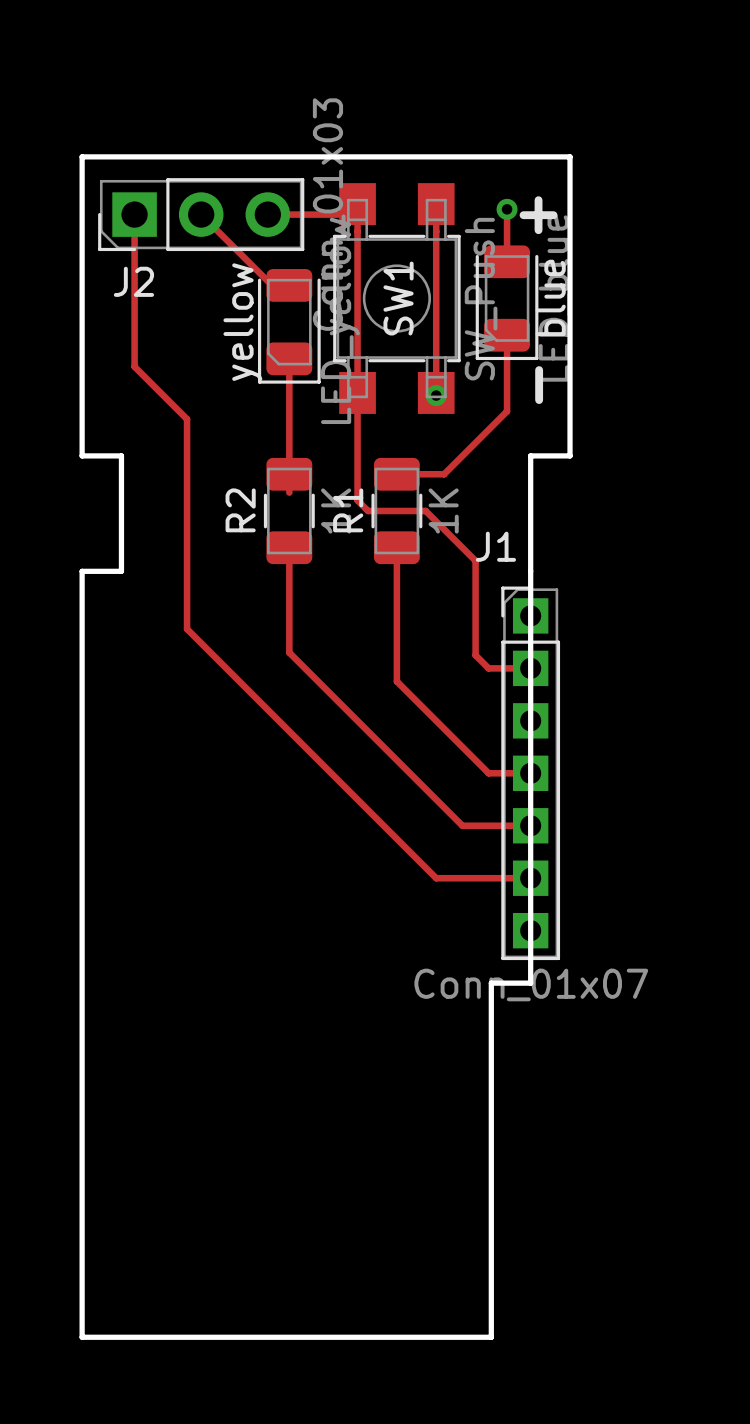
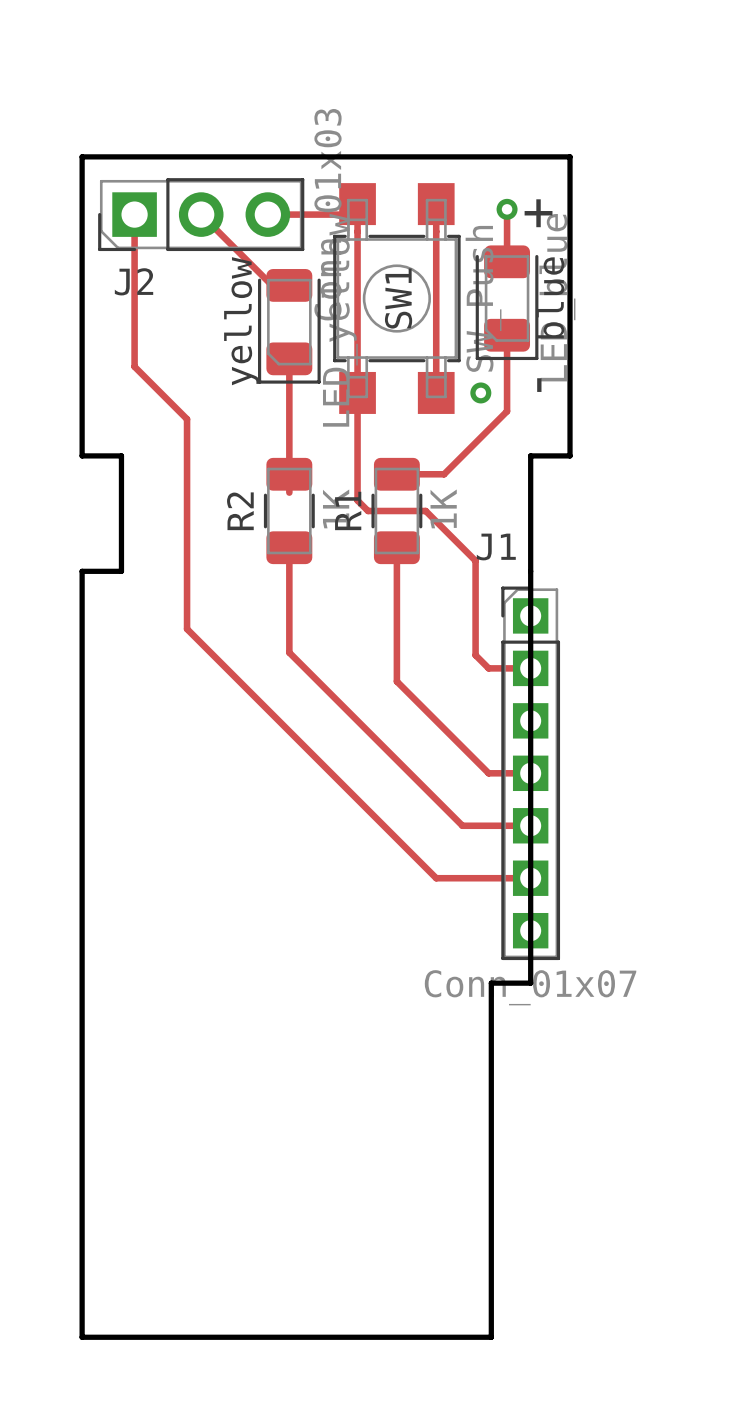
via position: (436, 395) -> (480, 392)

